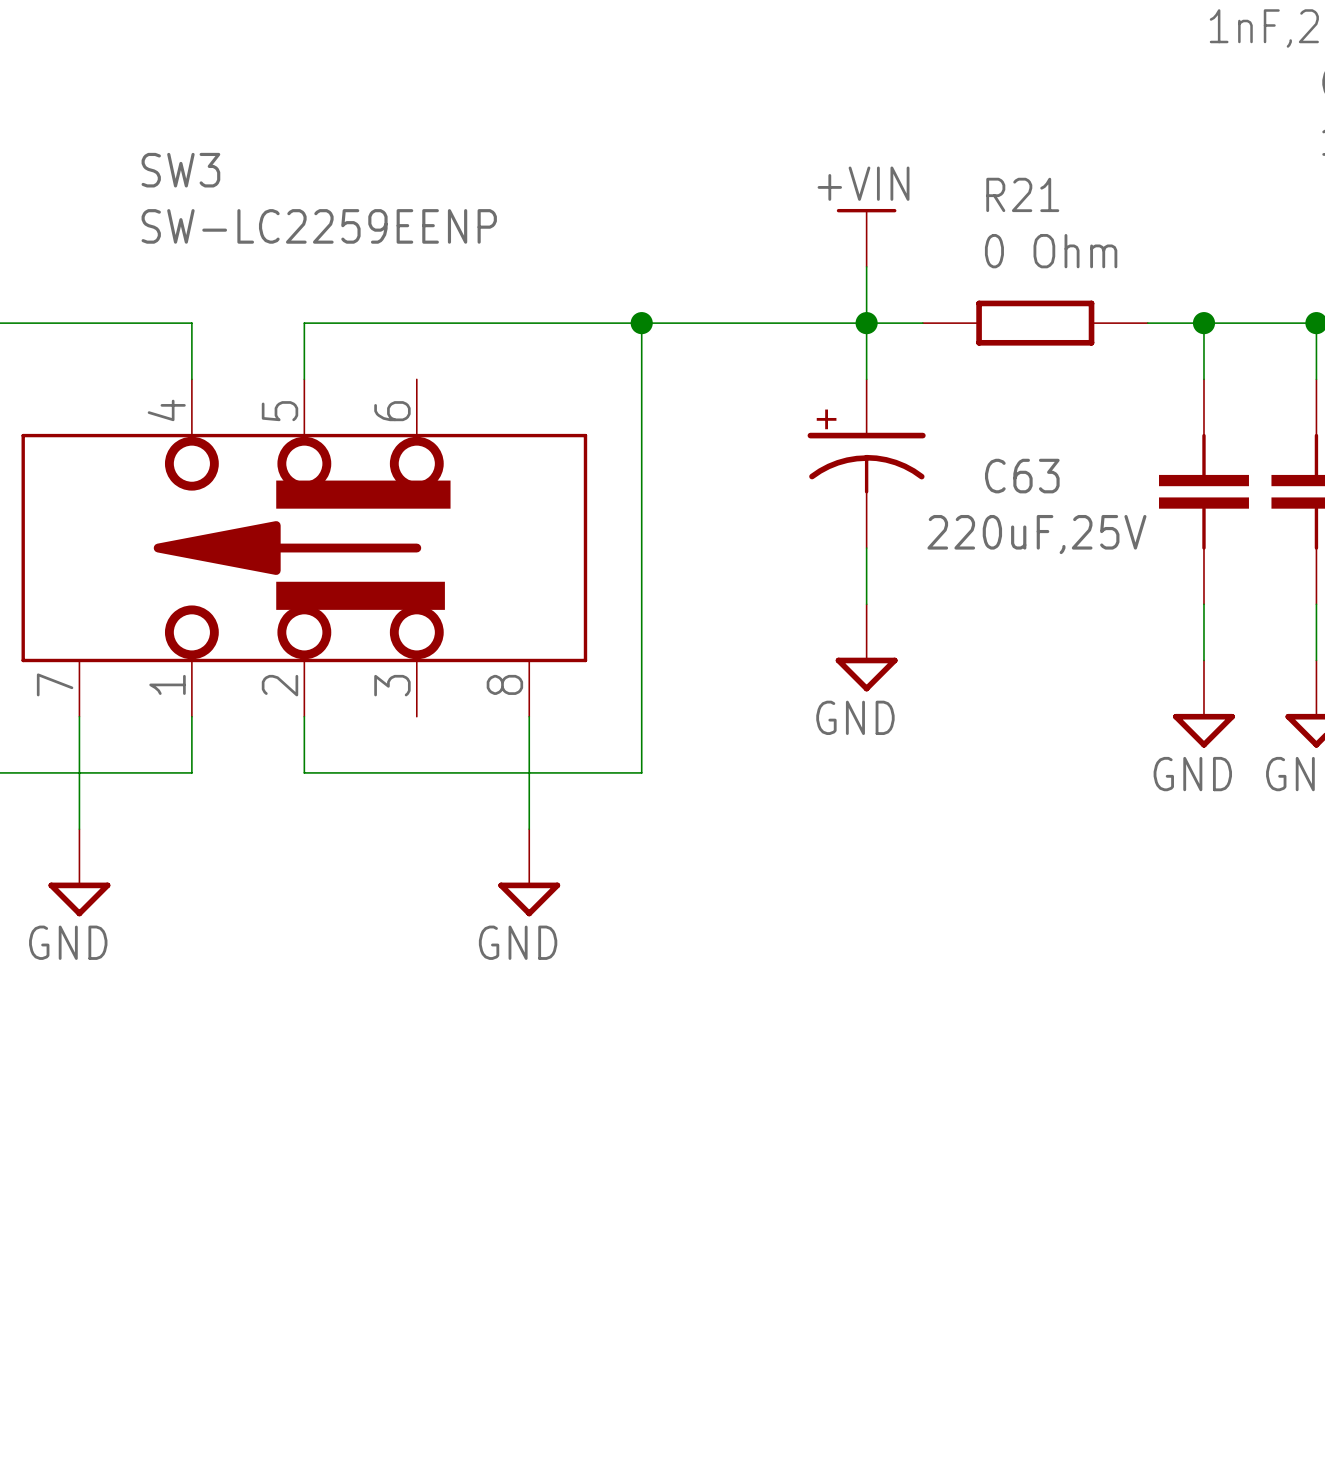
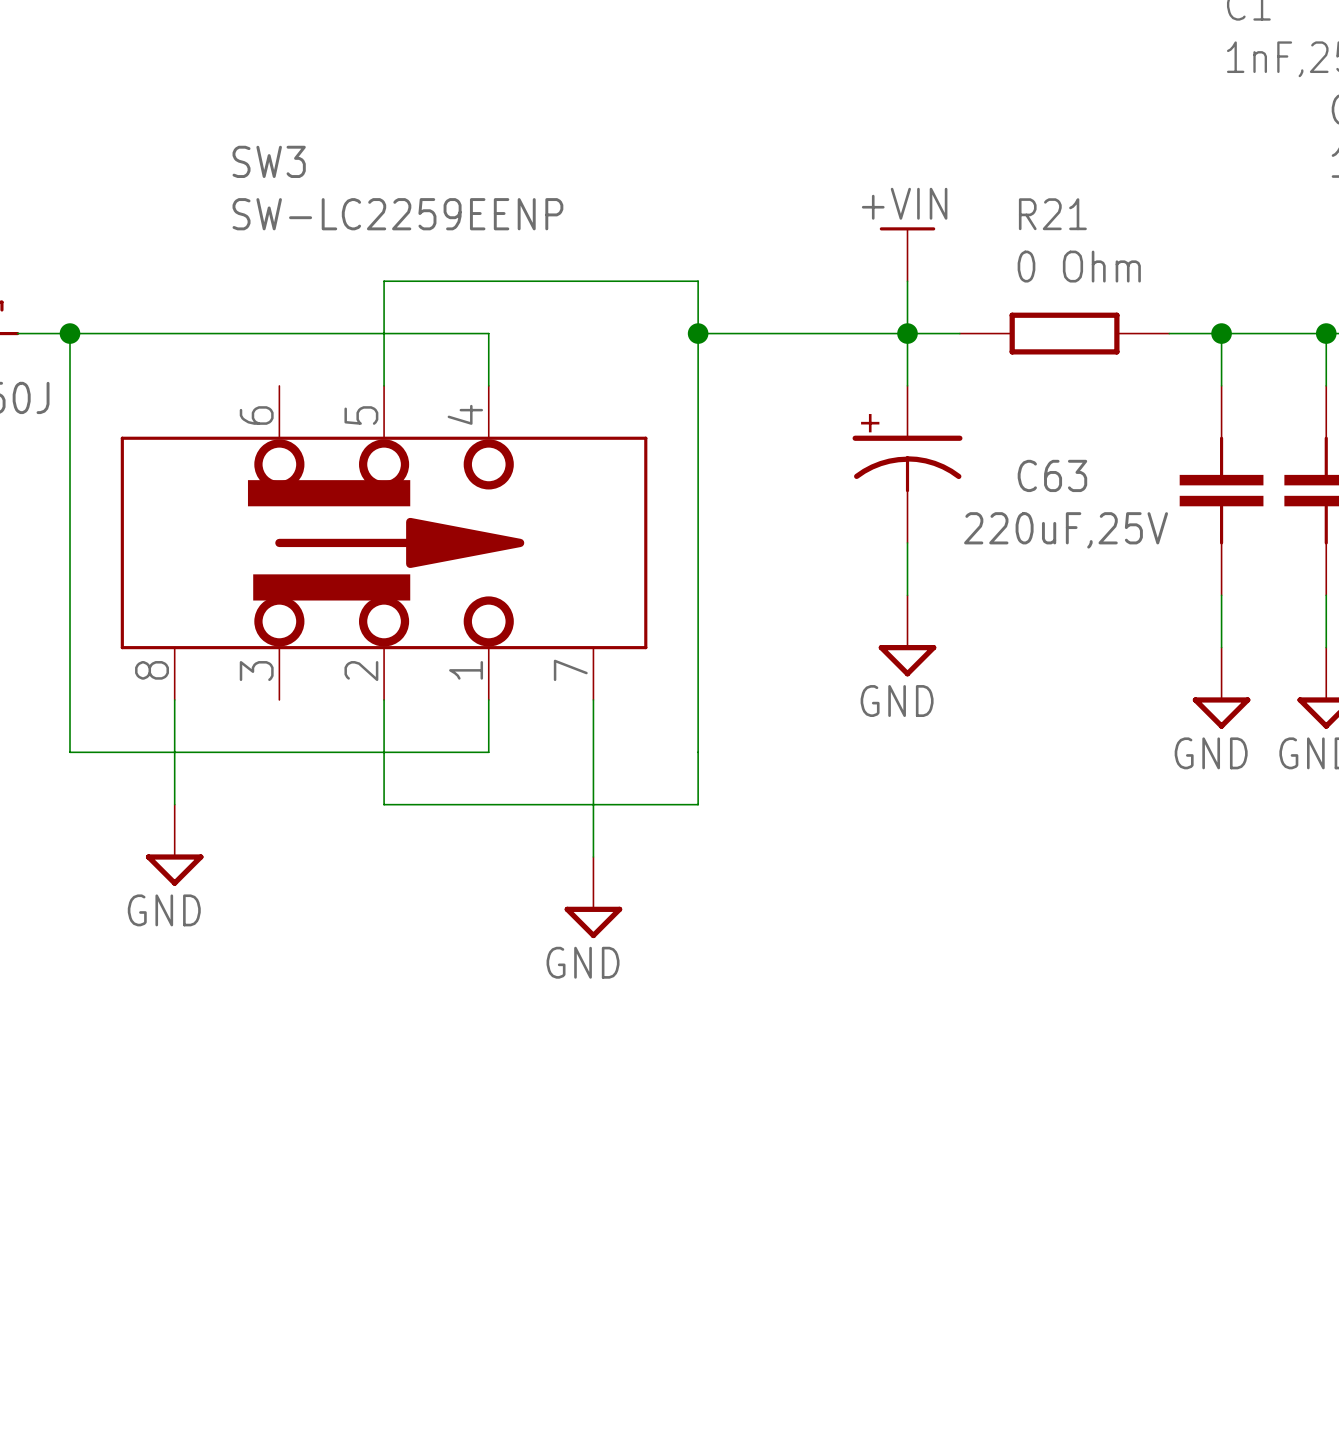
wire: (191, 323) (191, 379) -> (488, 333) (488, 385)
wire: (416, 323) (641, 323) -> (279, 333) (384, 333) (384, 281) (698, 281) (698, 333)
SW3 flip: as is (304, 548) -> left-right (384, 542)
wire: (191, 716) (191, 772) -> (488, 699) (488, 752)
wire: (416, 772) (641, 772) -> (279, 752) (384, 752) (384, 804) (698, 804) (698, 752)
power symbol position: GND (529, 872) -> GND (593, 897)

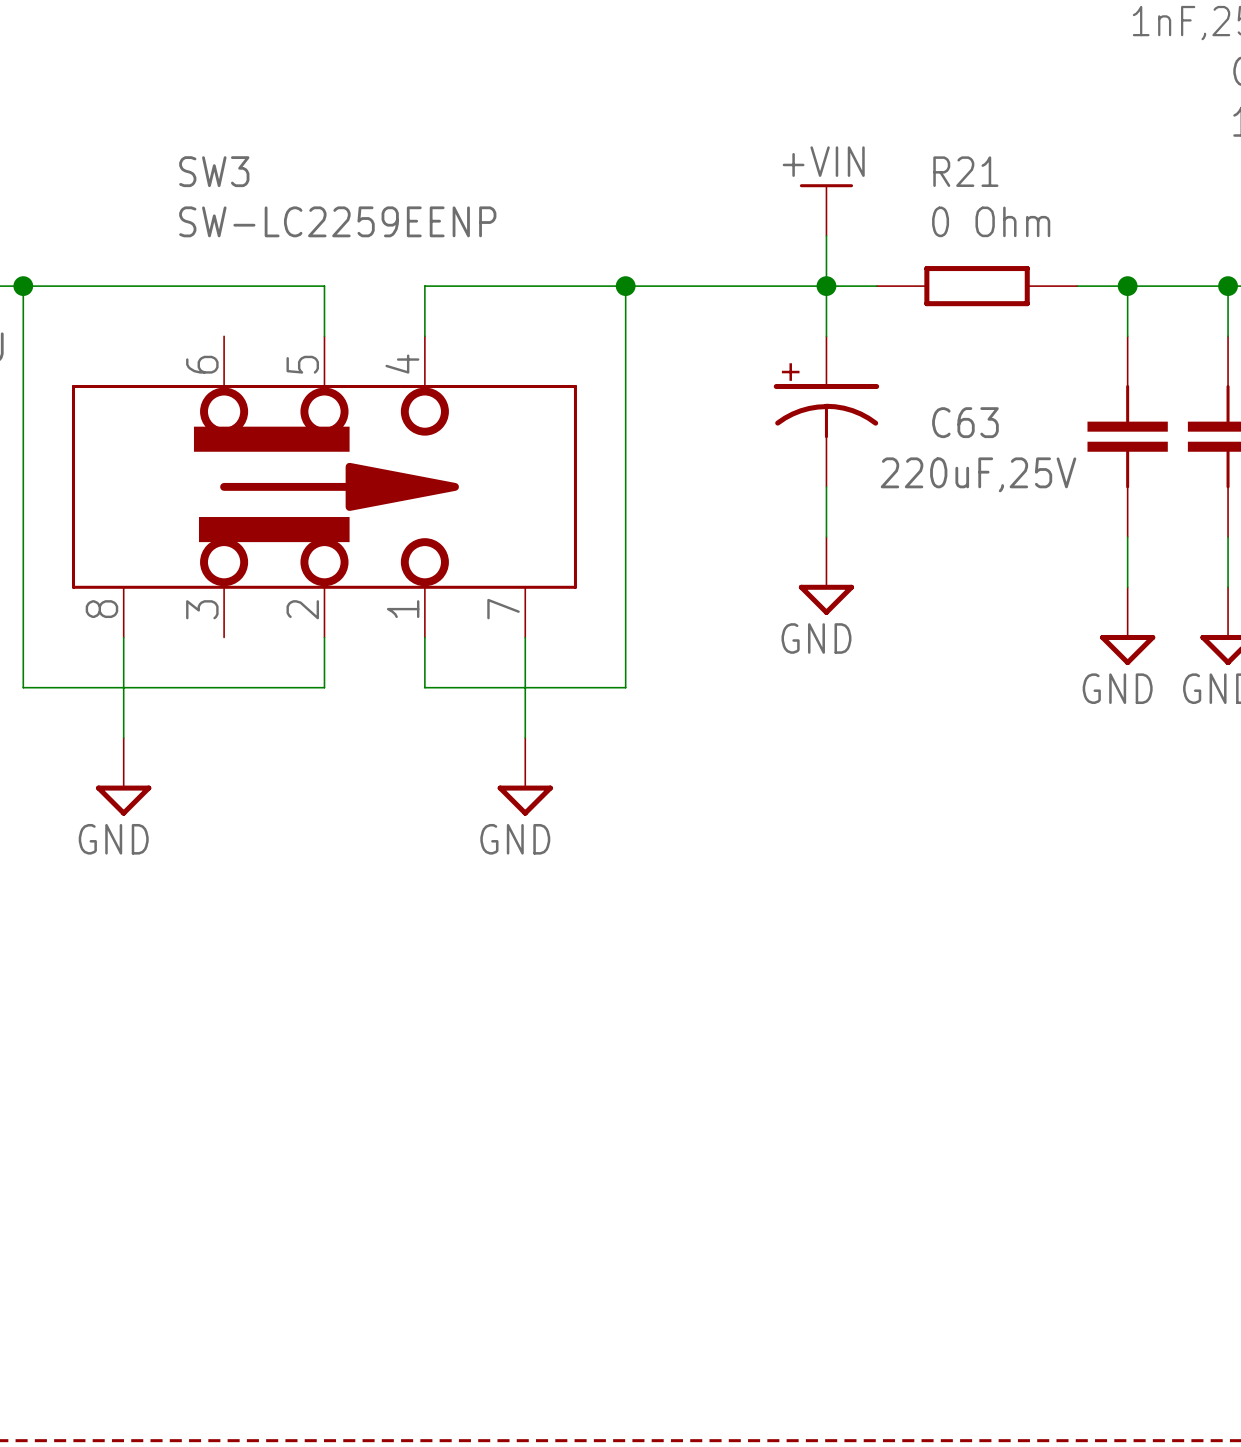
SW3 name position: SW3 (269, 161) -> SW3 (214, 171)
SW3 value position: SW-LC2259EENP (397, 214) -> SW-LC2259EENP (337, 221)
wire: (488, 333) (384, 333) (384, 281) (698, 281) (698, 333) -> (424, 286) (625, 286)
wire: (488, 752) (384, 752) (384, 804) (698, 804) (698, 752) -> (424, 687) (625, 687)
power symbol position: GND (593, 897) -> GND (525, 776)

